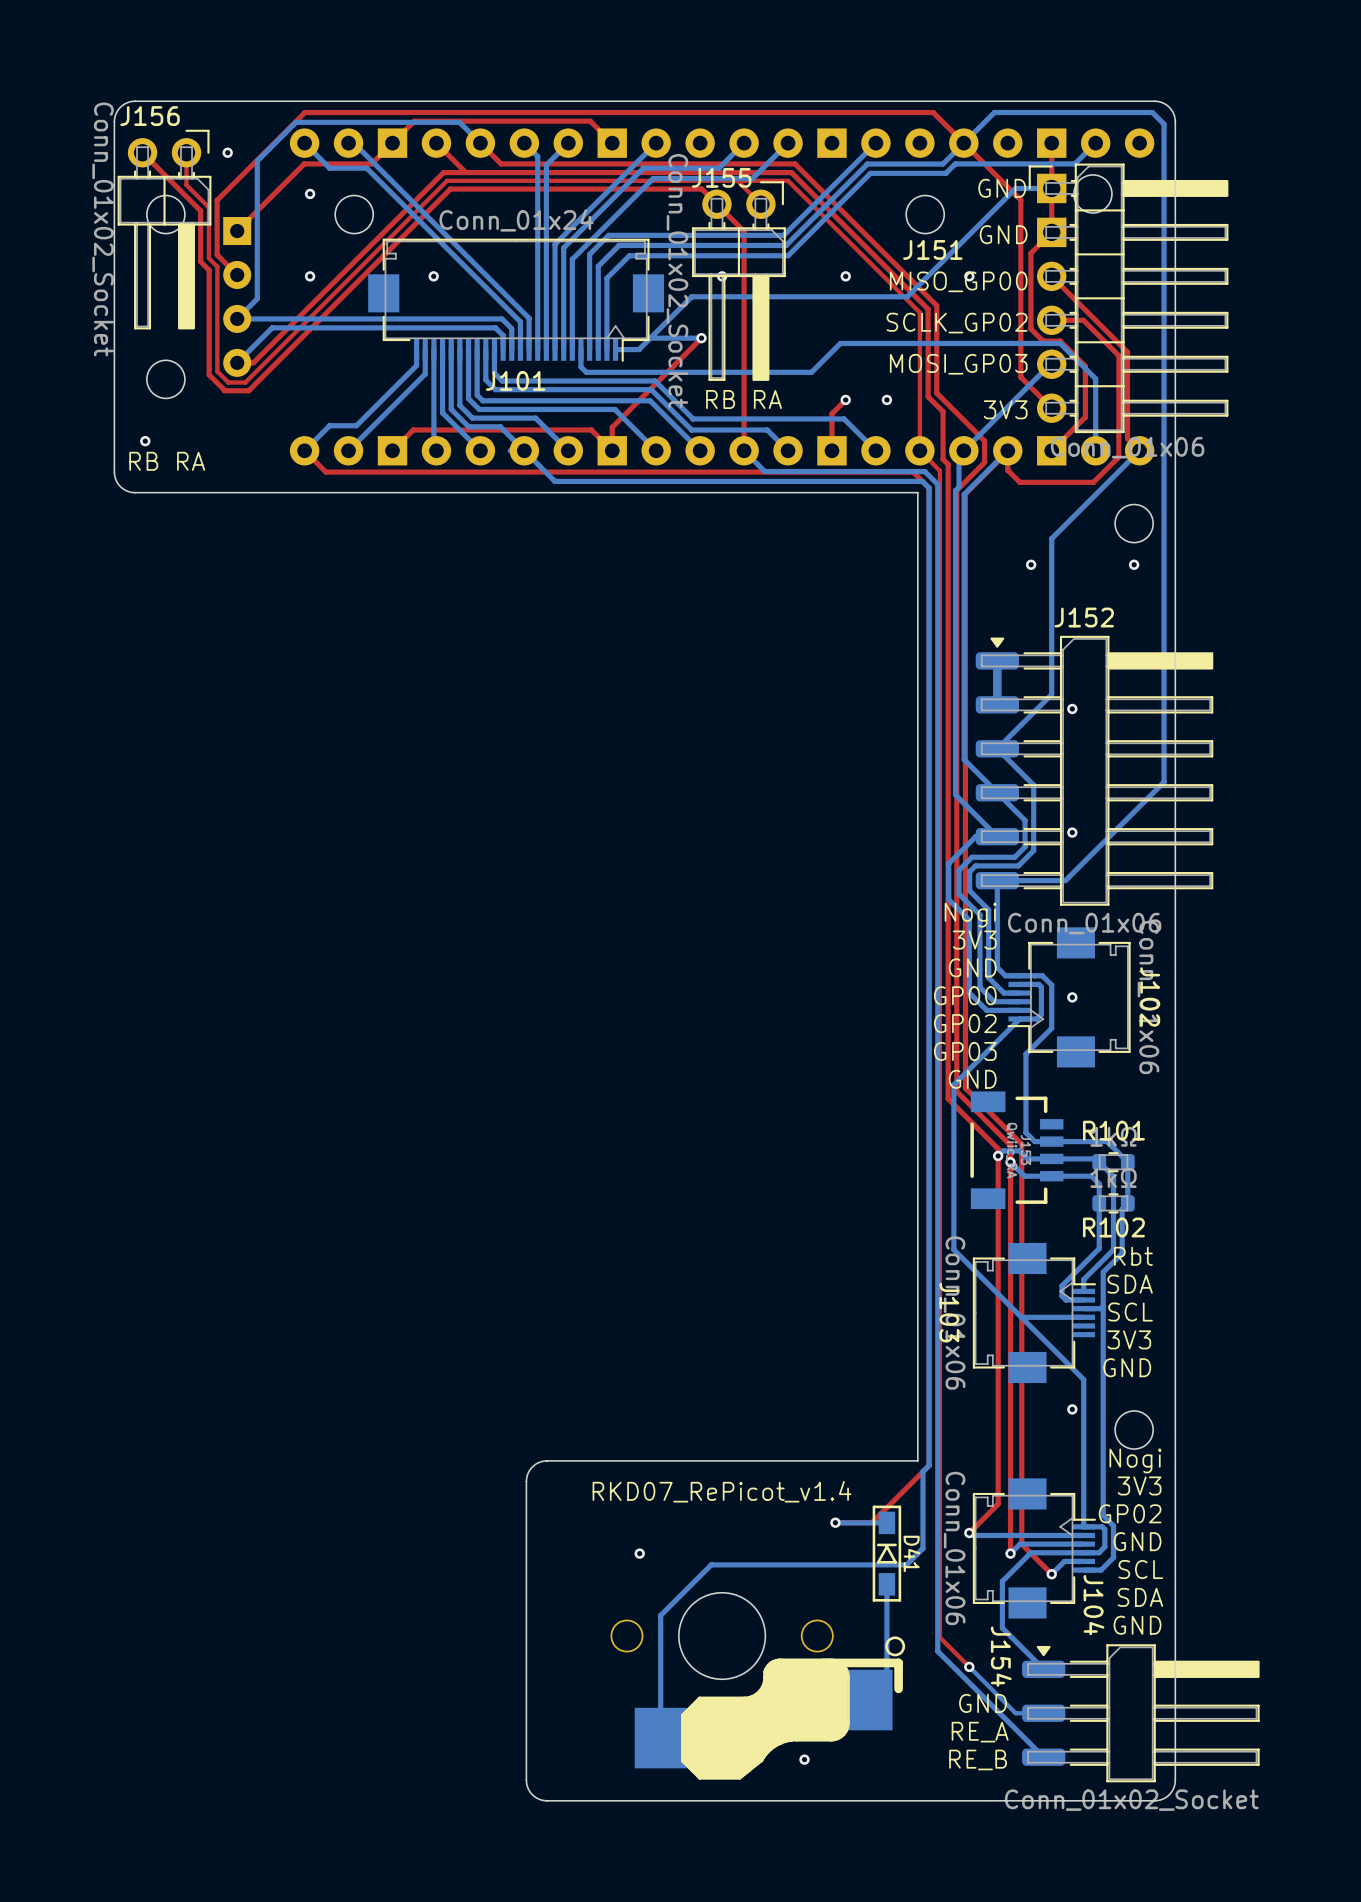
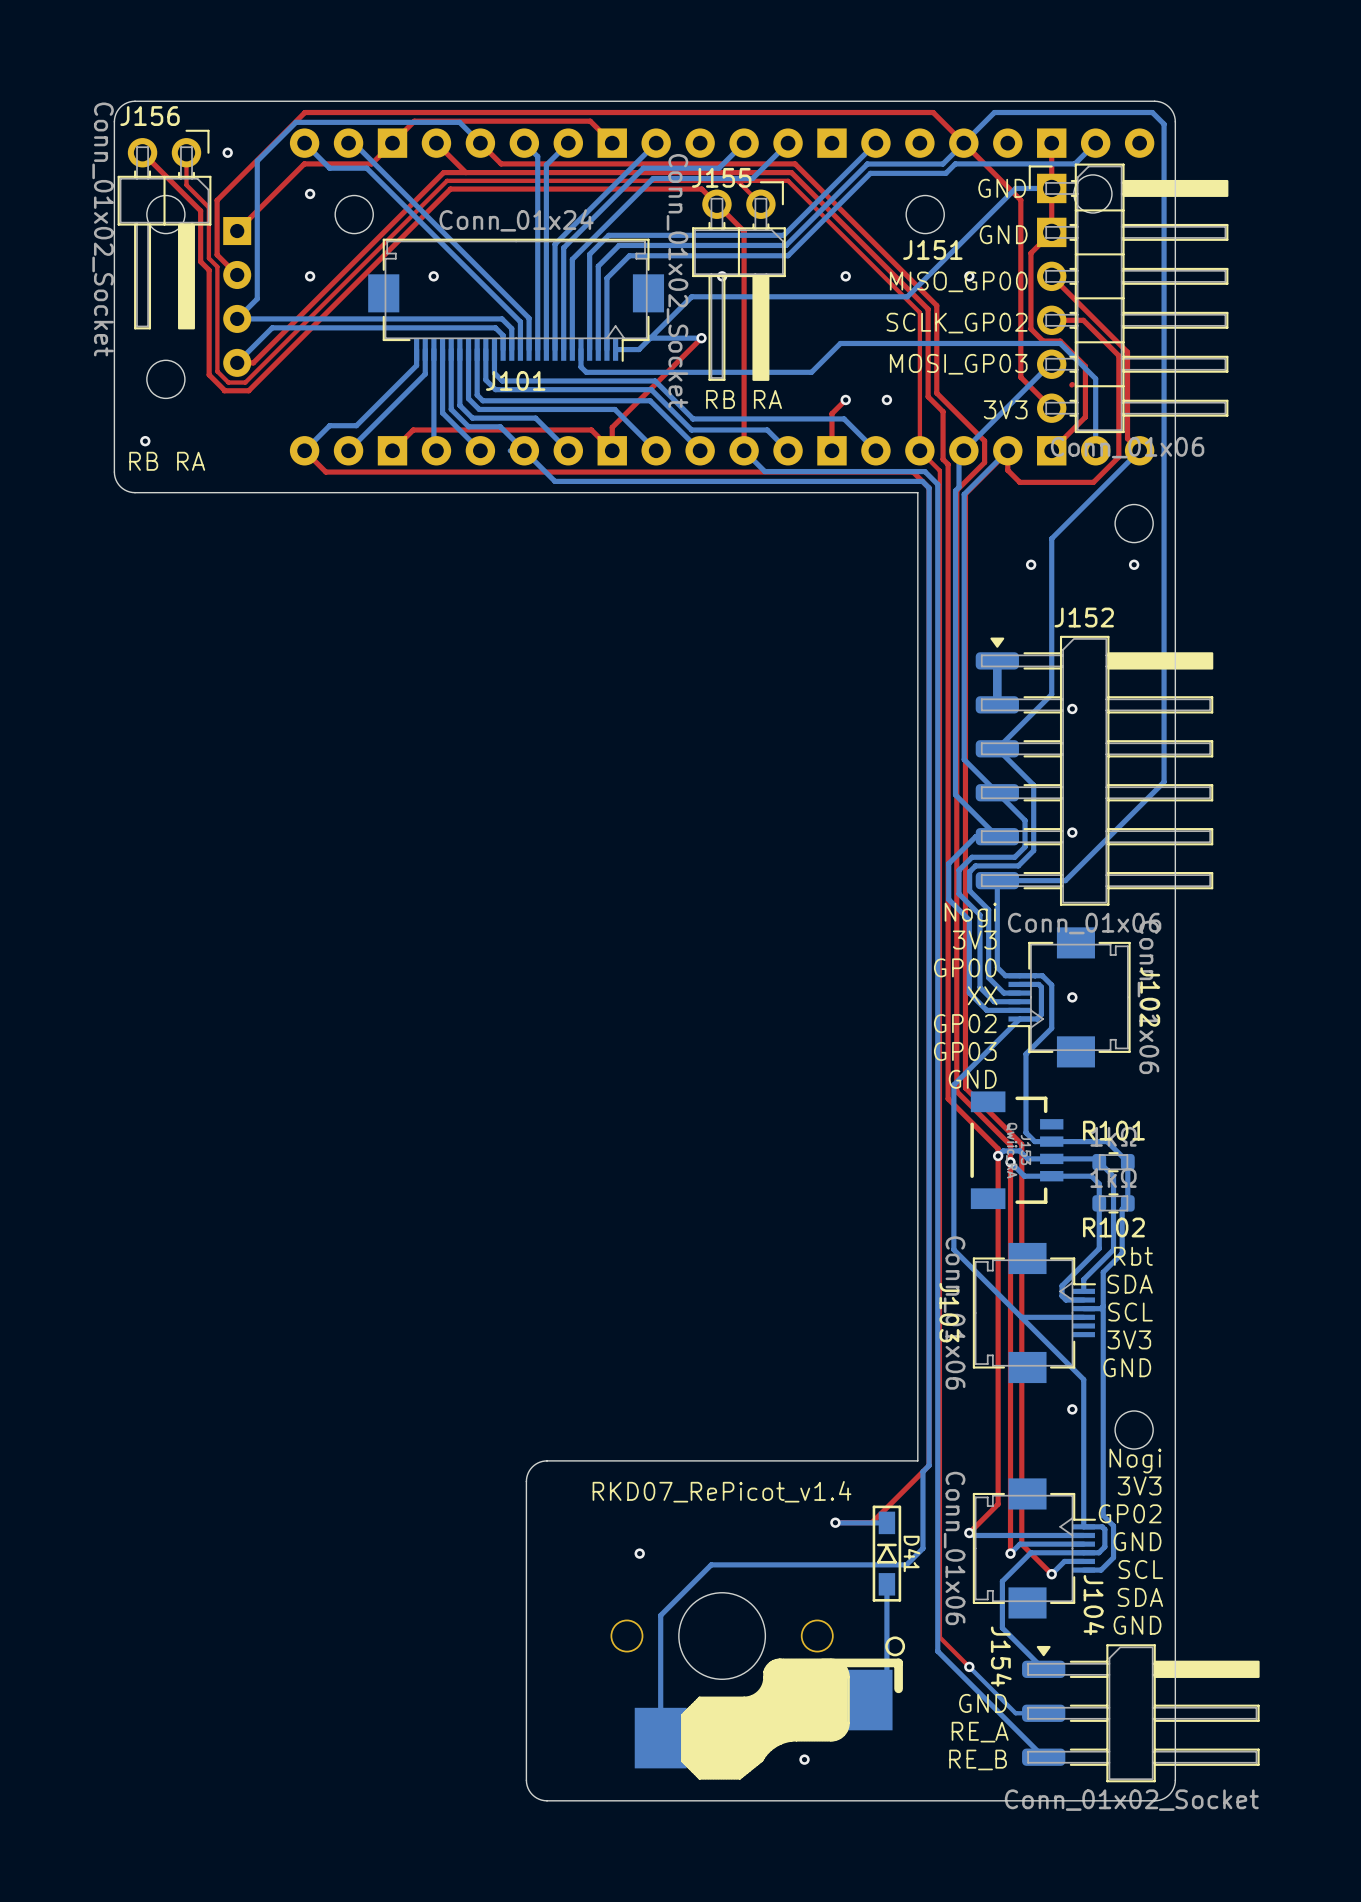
top track: none -> (1072, 384) (1071, 385)
text: GND (972, 967) -> GP00 (965, 967)
text: GP00 (965, 995) -> XX (982, 995)

